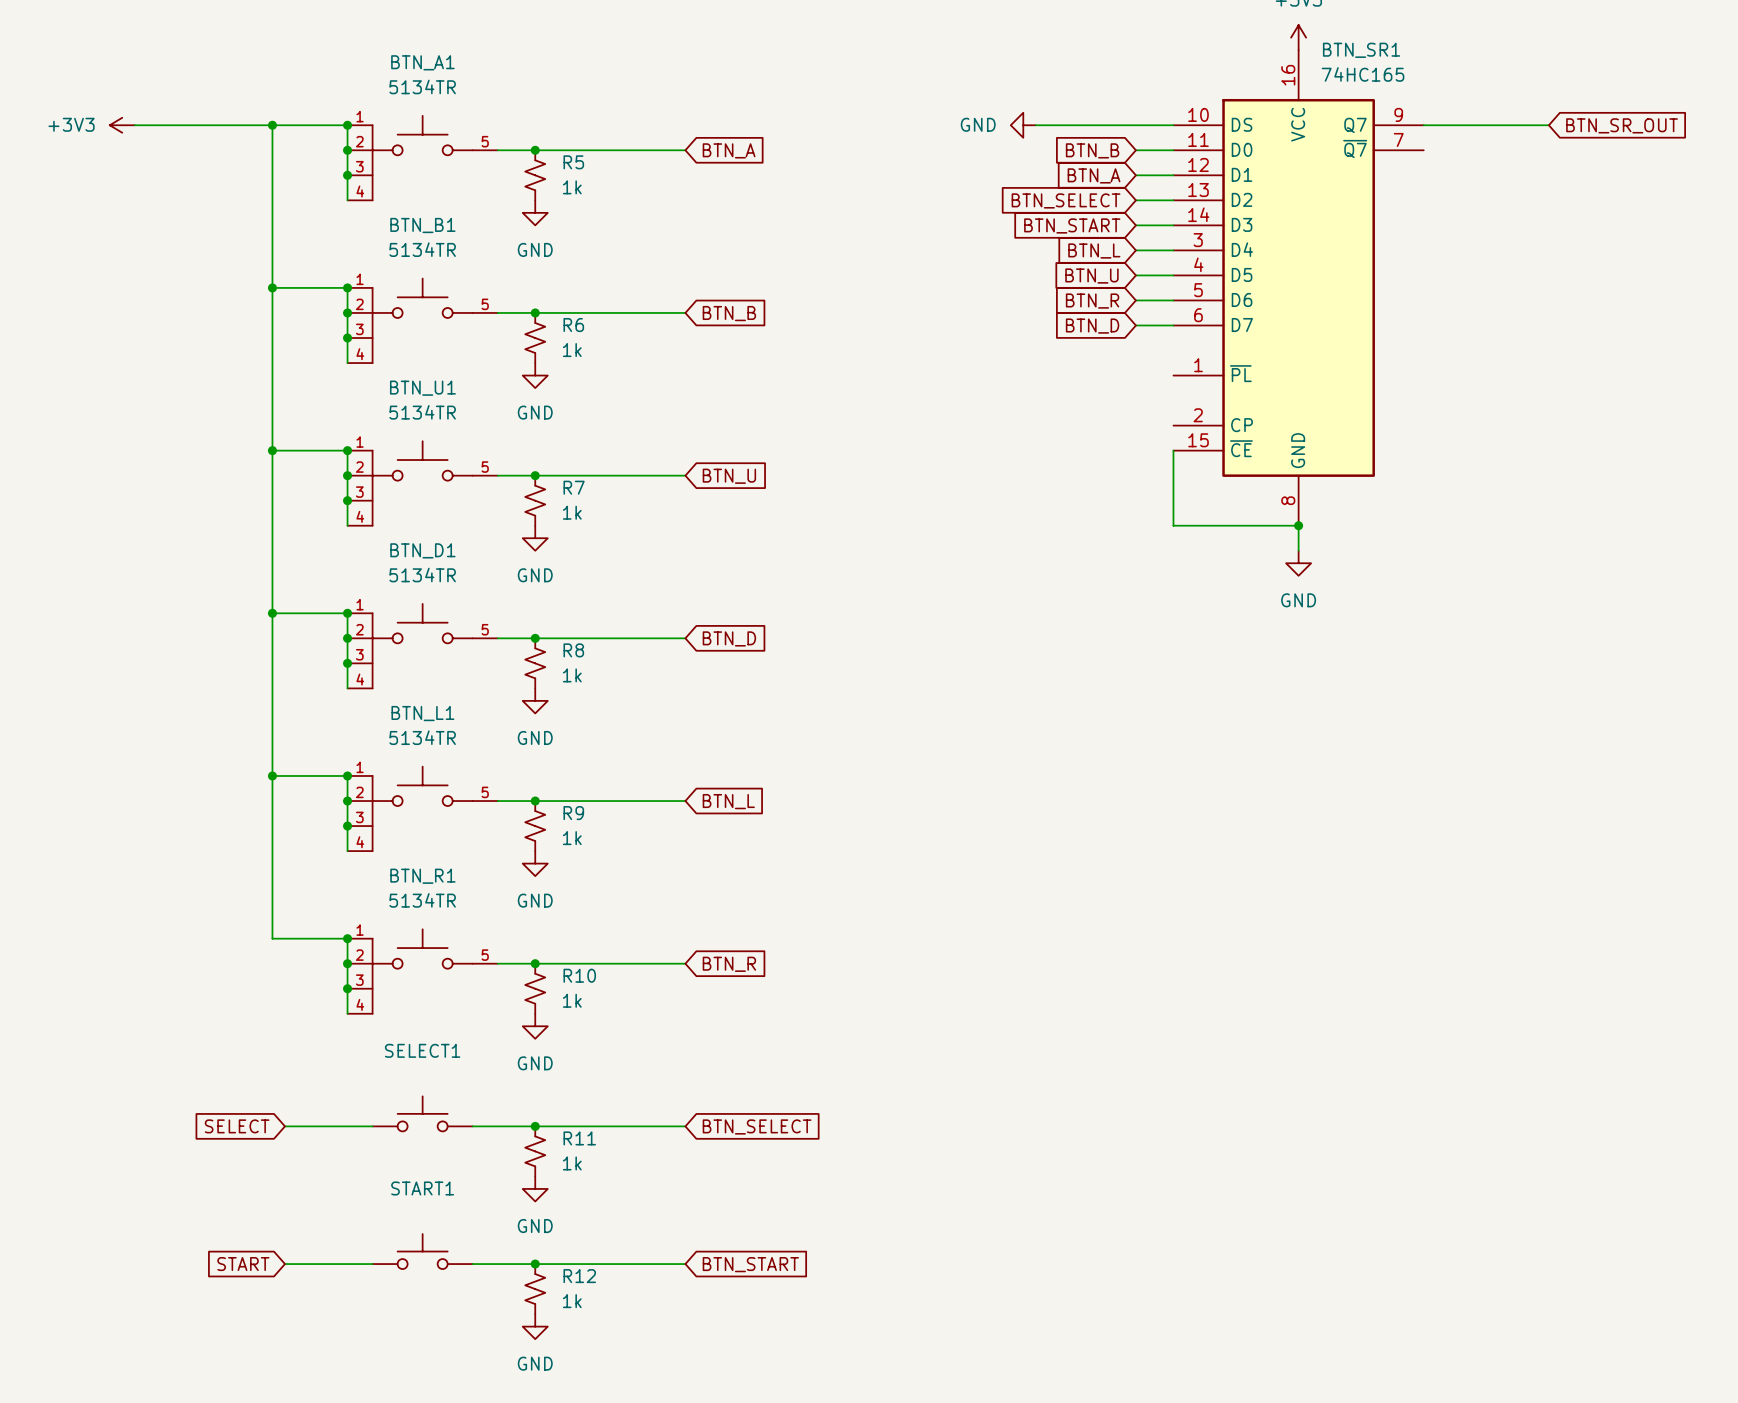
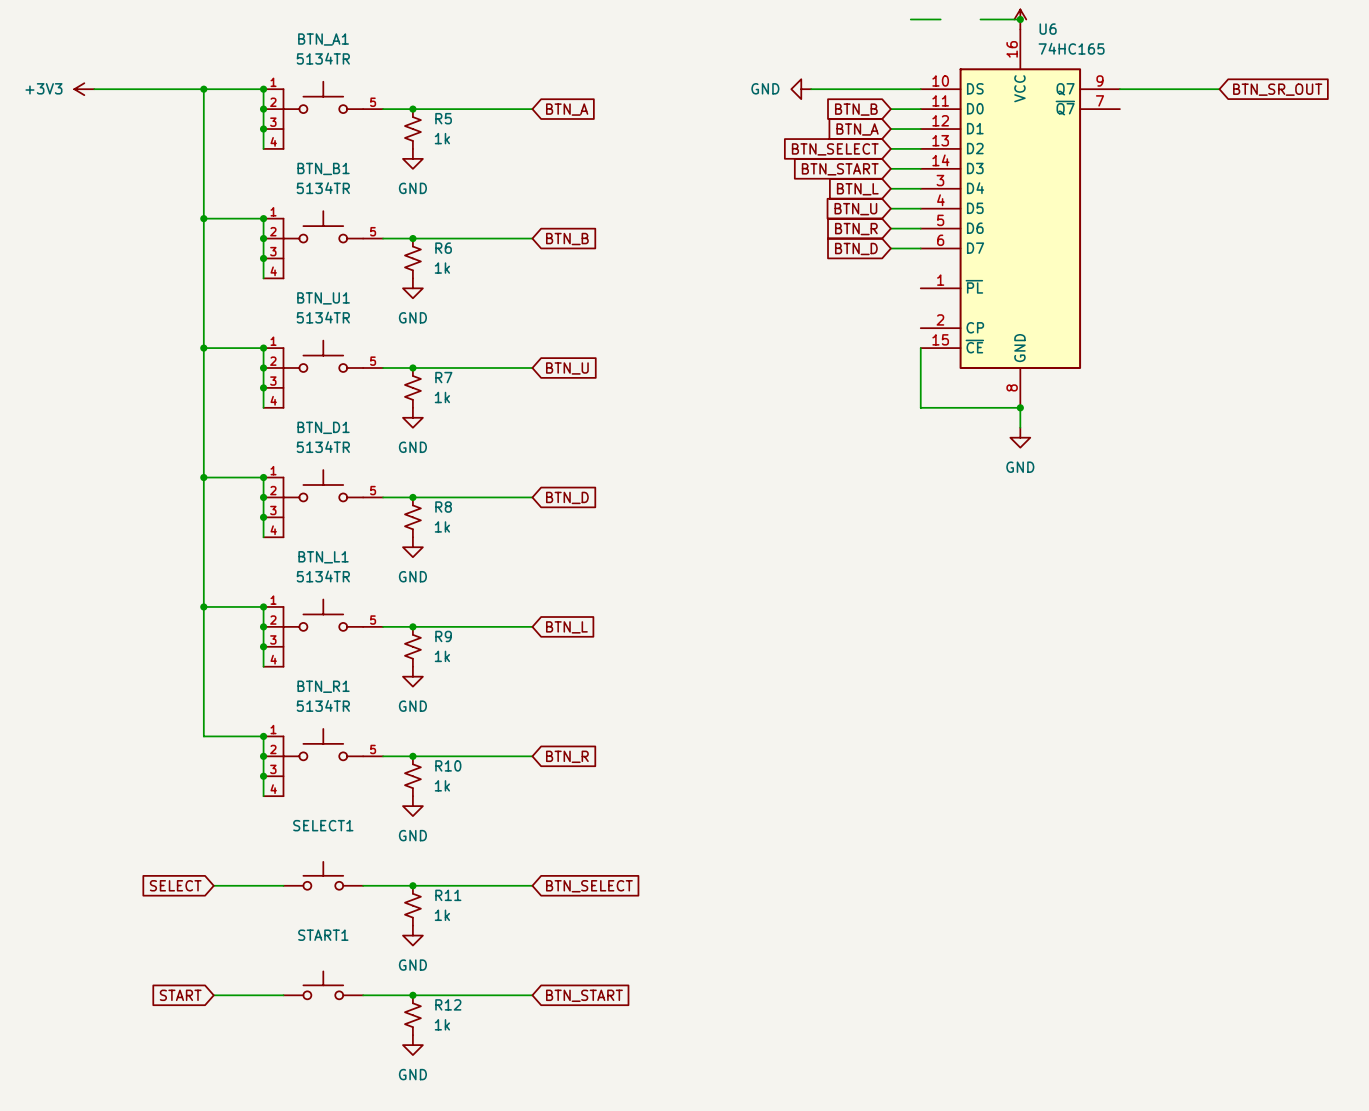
wire: none -> (910, 19) (940, 19)
wire: none -> (980, 19) (1020, 19)
junction: none -> (1020, 19)
BTN_SR1 name: BTN_SR1 (1361, 50) -> U6 (1048, 29)

